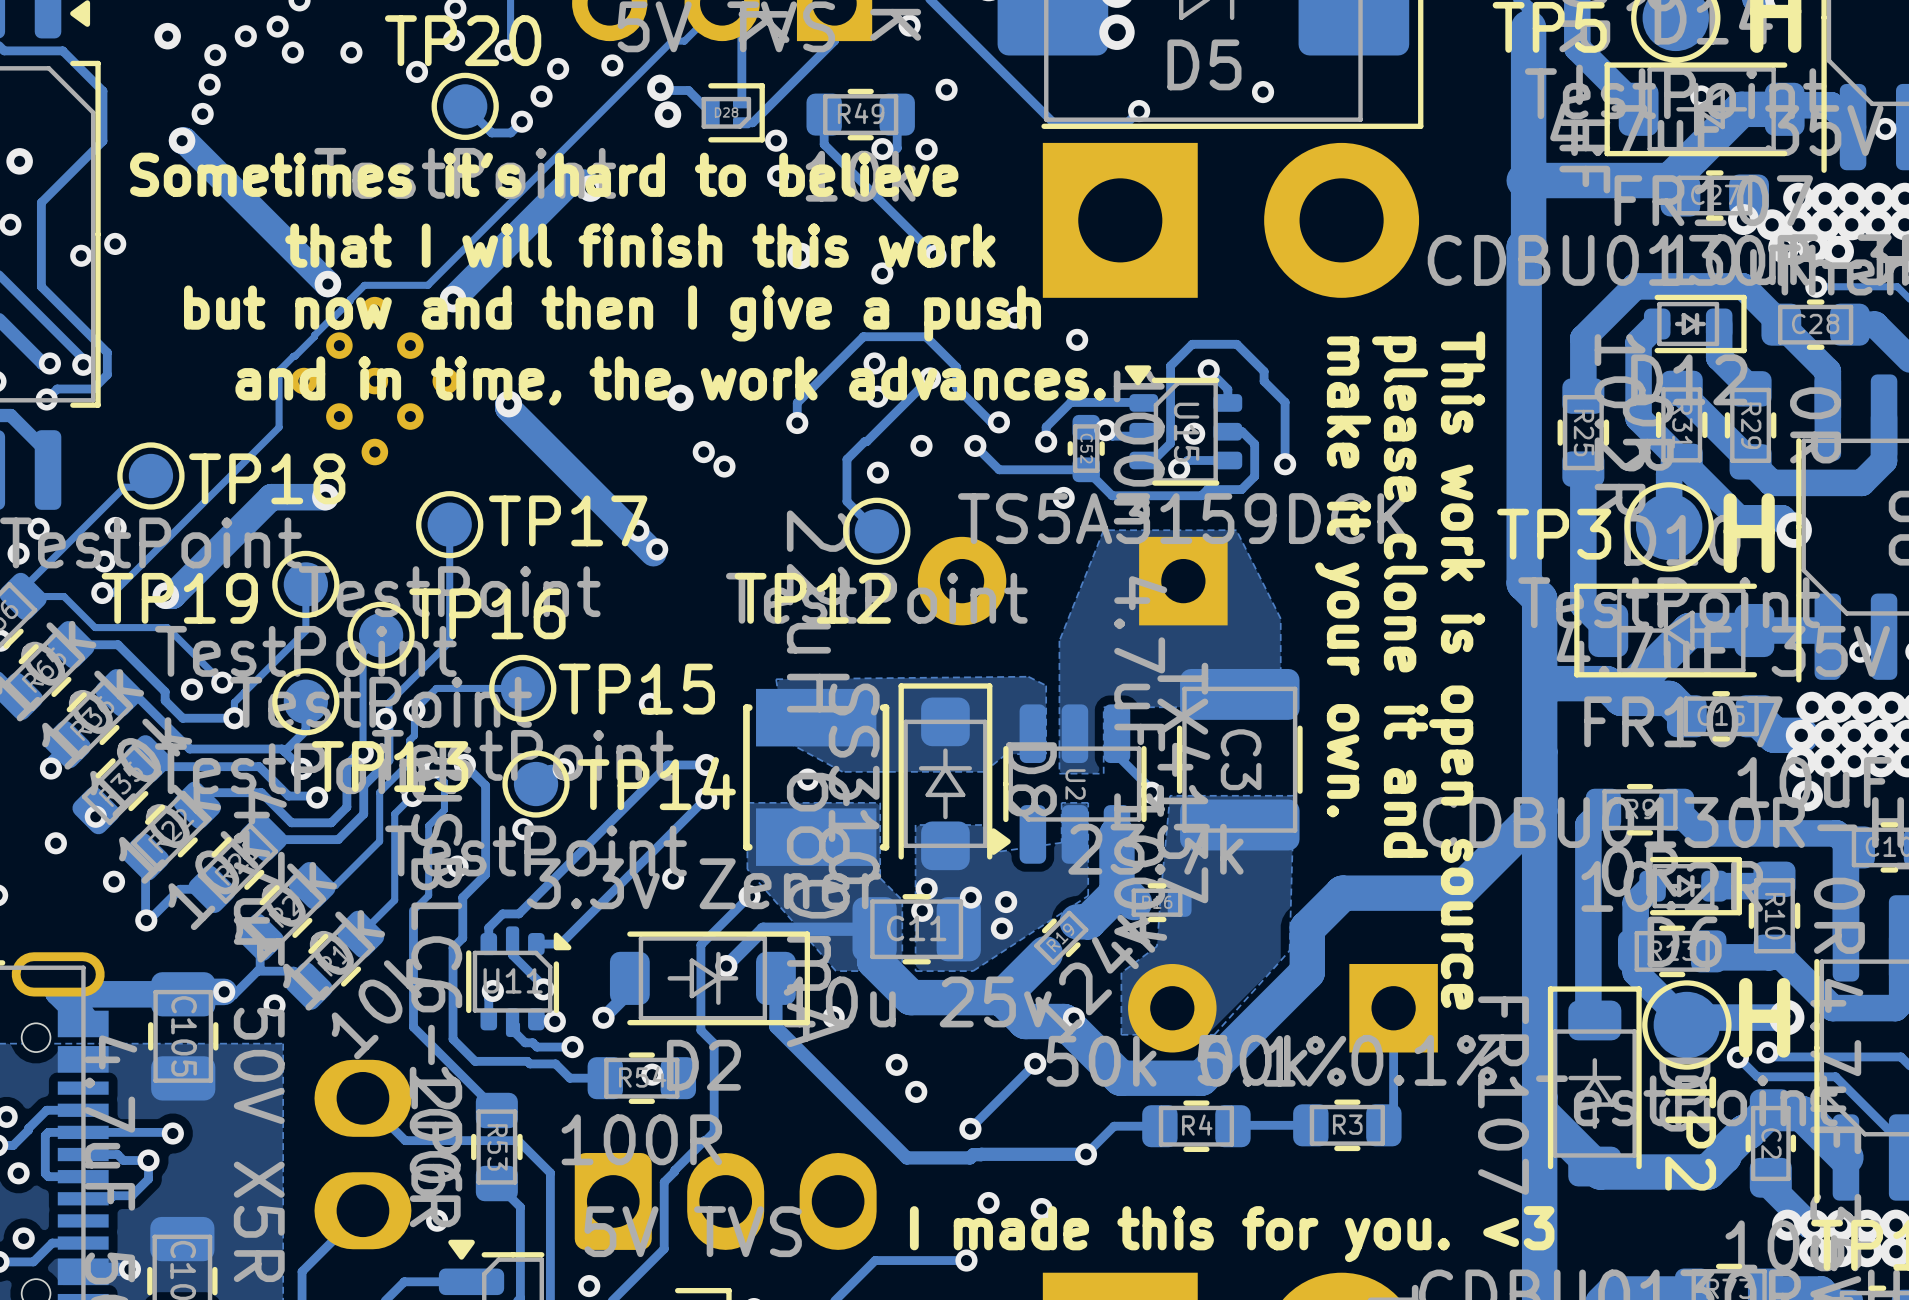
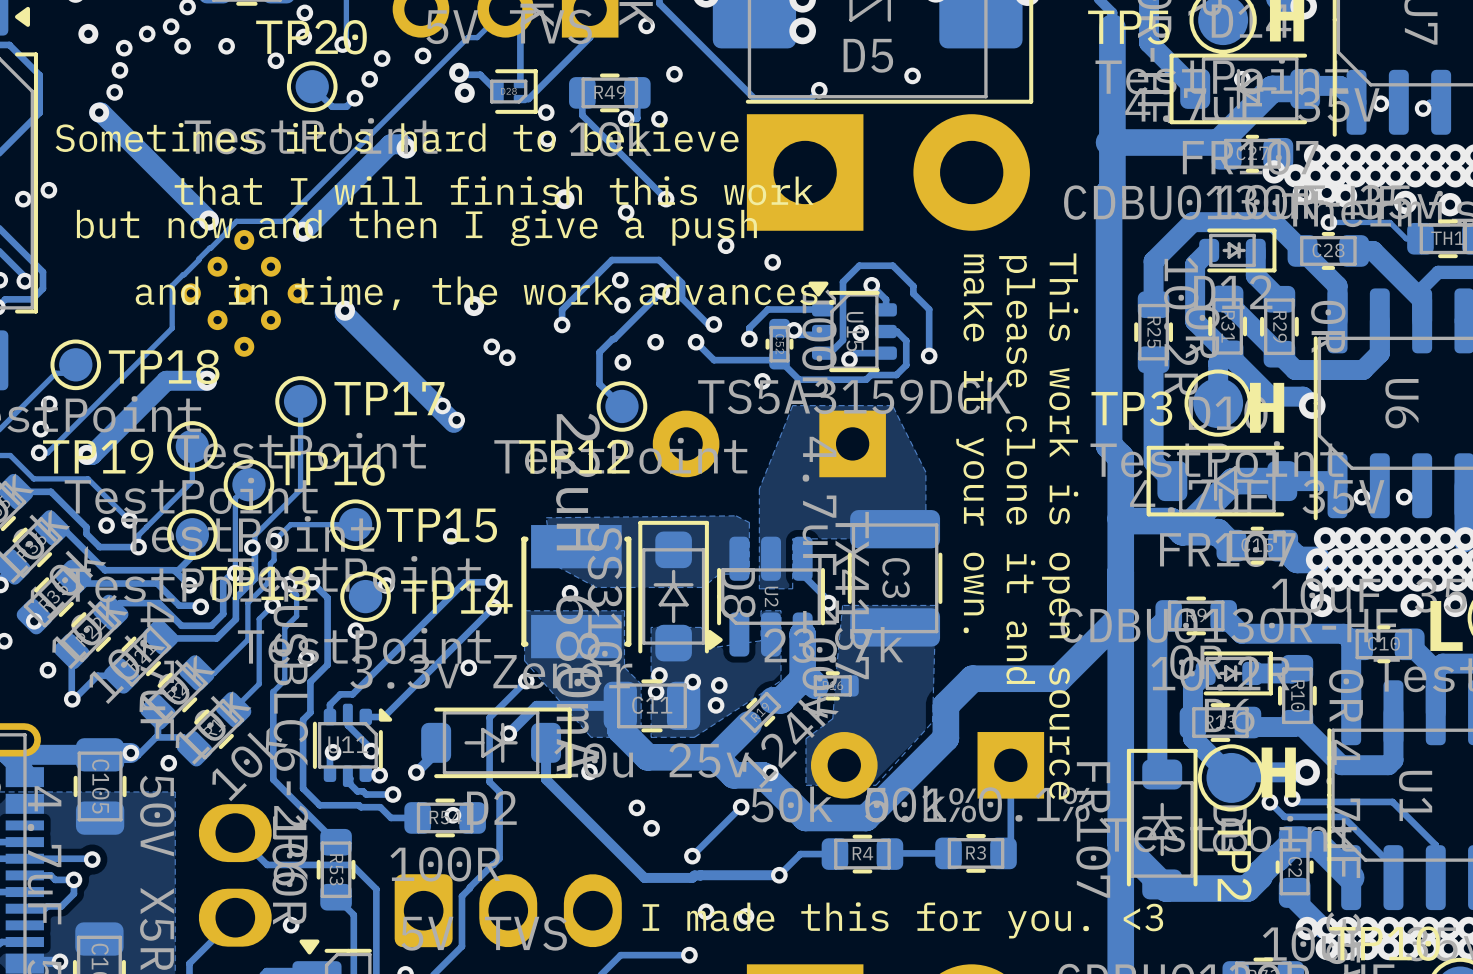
text position: but now and then I give a push (612, 313) -> but now and then I give a push (416, 227)
text position: I made this for you. <3 (1232, 1234) -> I made this for you. <3 (902, 920)

